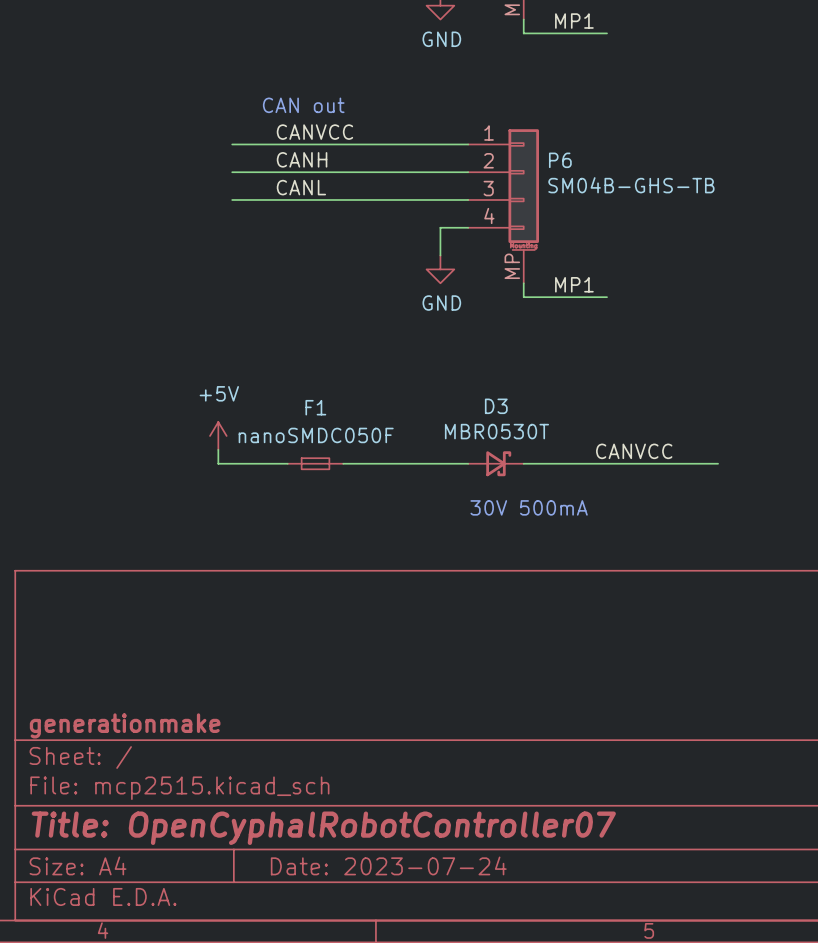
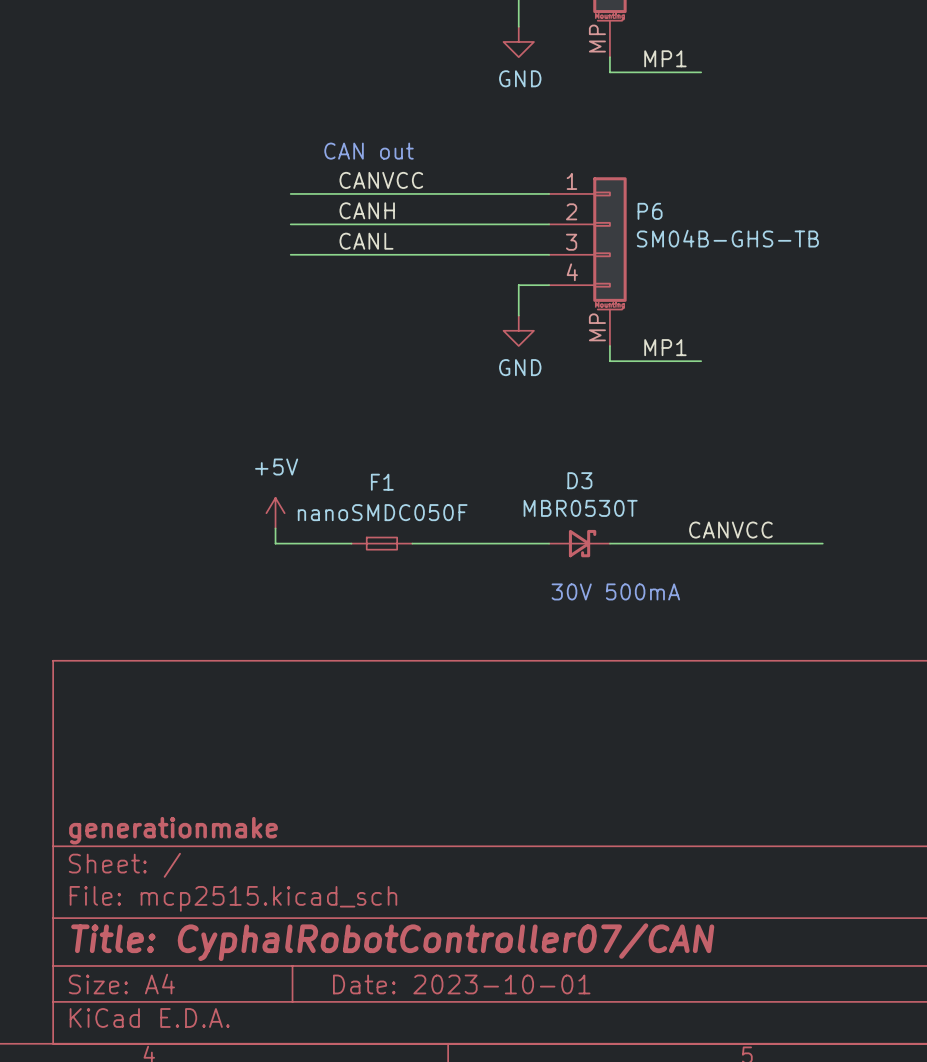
title block: Title: OpenCyphalRobotController07 (323, 828) -> Title: CyphalRobotController07/CAN (392, 942)
title block: Date: 2023-07-24 (388, 865) -> Date: 2023-10-01 (461, 984)

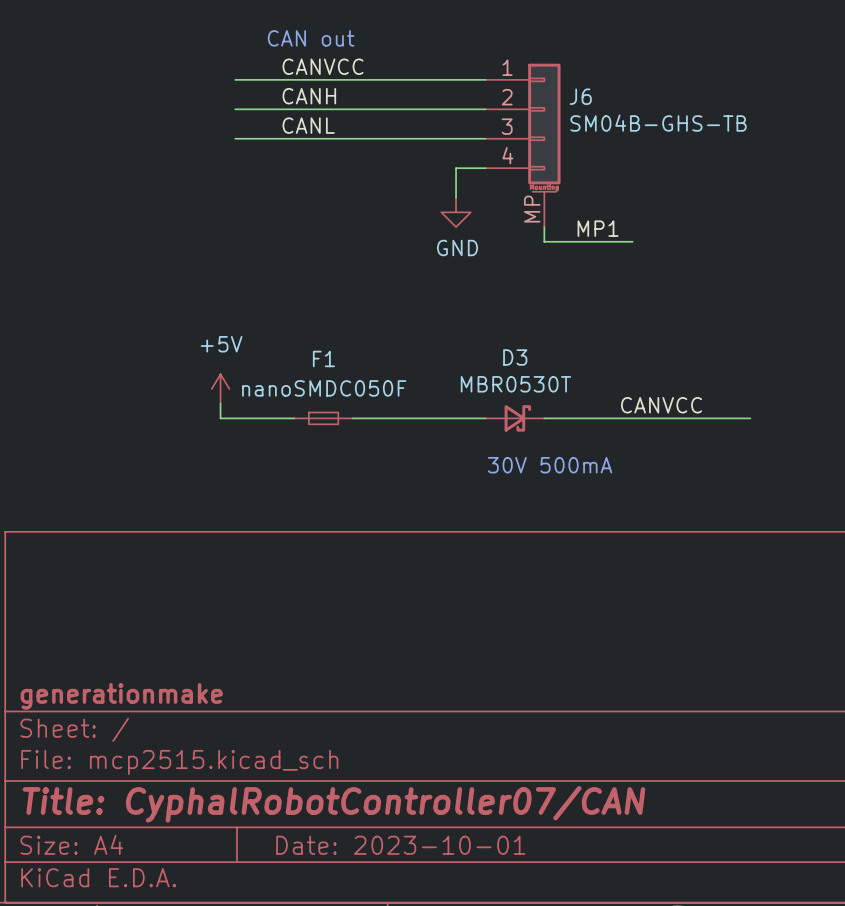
P6 name: P6 (650, 211) -> J6 (580, 96)

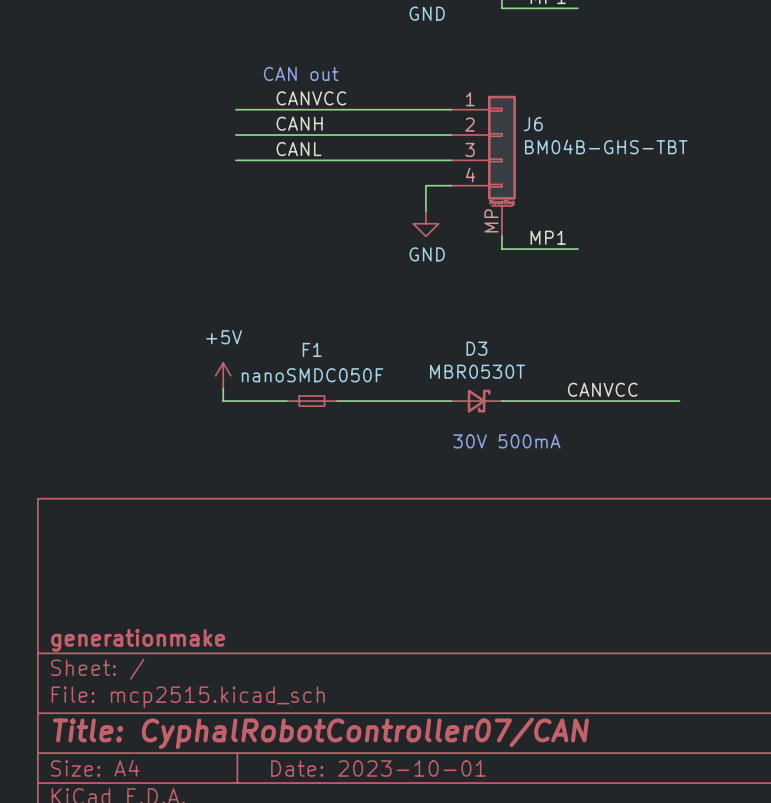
J6 value: SM04B-GHS-TB (658, 123) -> BM04B-GHS-TBT (606, 146)

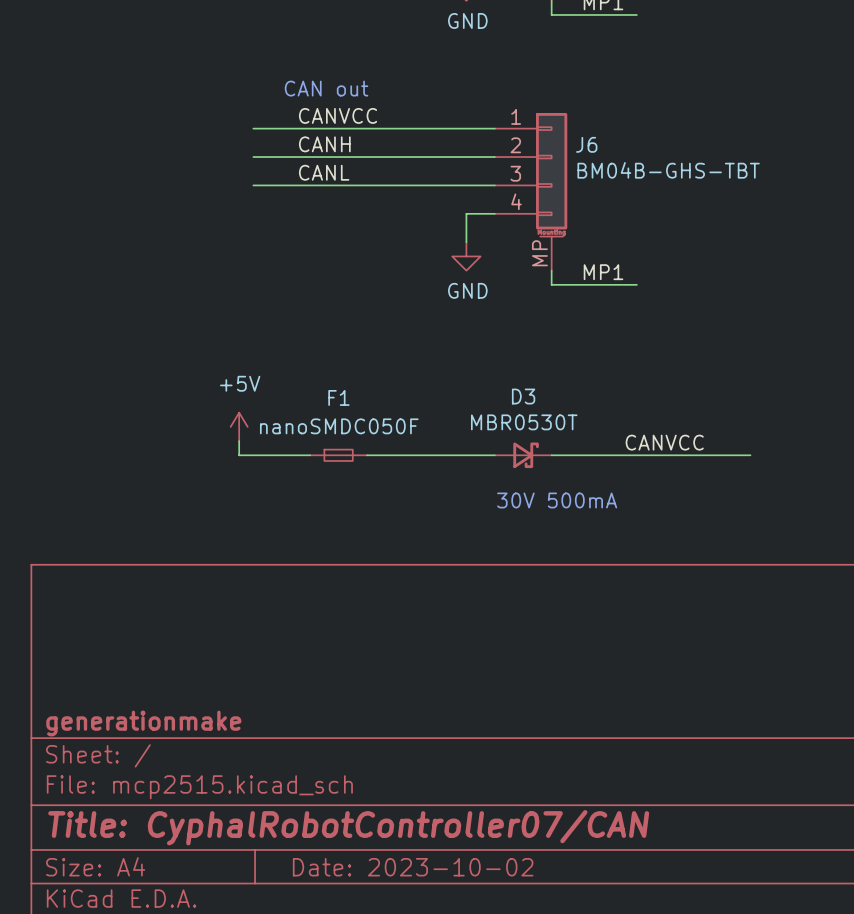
title block: Date: 2023-10-01 (378, 768) -> Date: 2023-10-02 (413, 867)

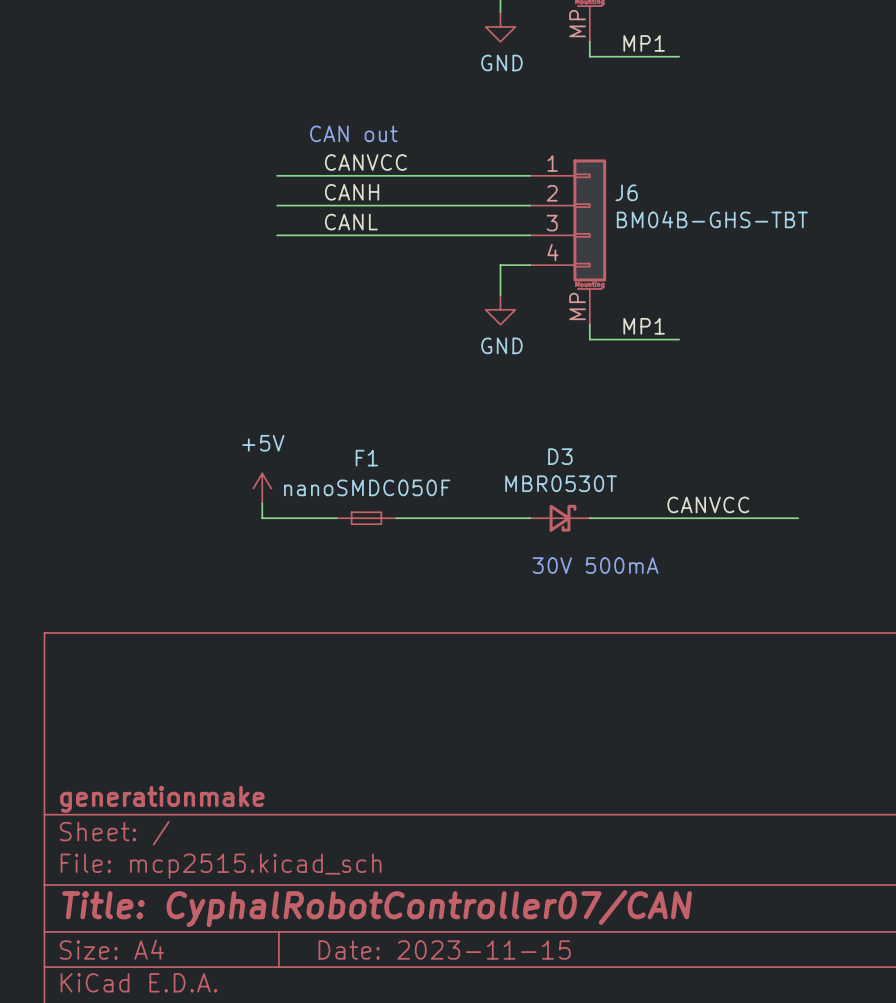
title block: Date: 2023-10-02 (413, 867) -> Date: 2023-11-15 (444, 950)

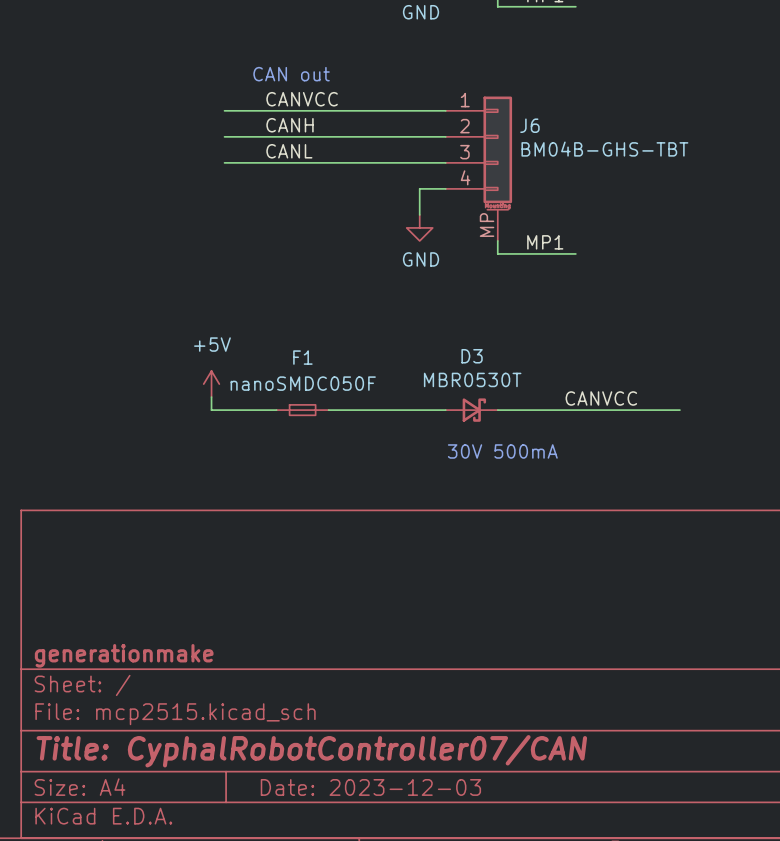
title block: Date: 2023-11-15 (444, 950) -> Date: 2023-12-03 (370, 787)

